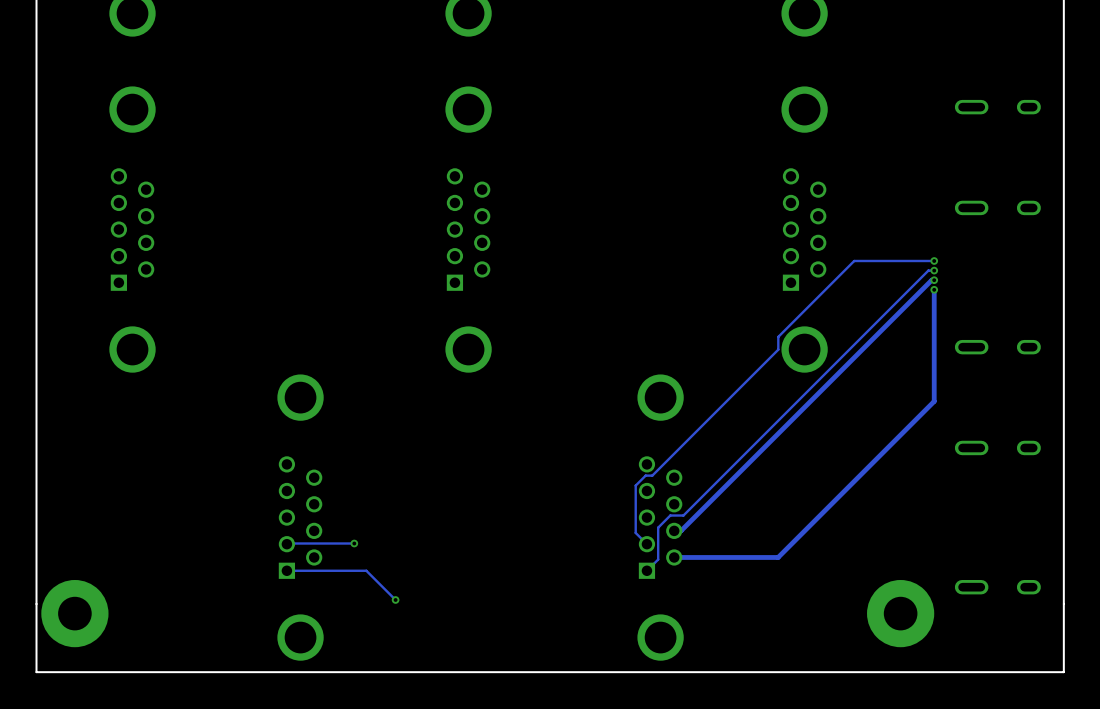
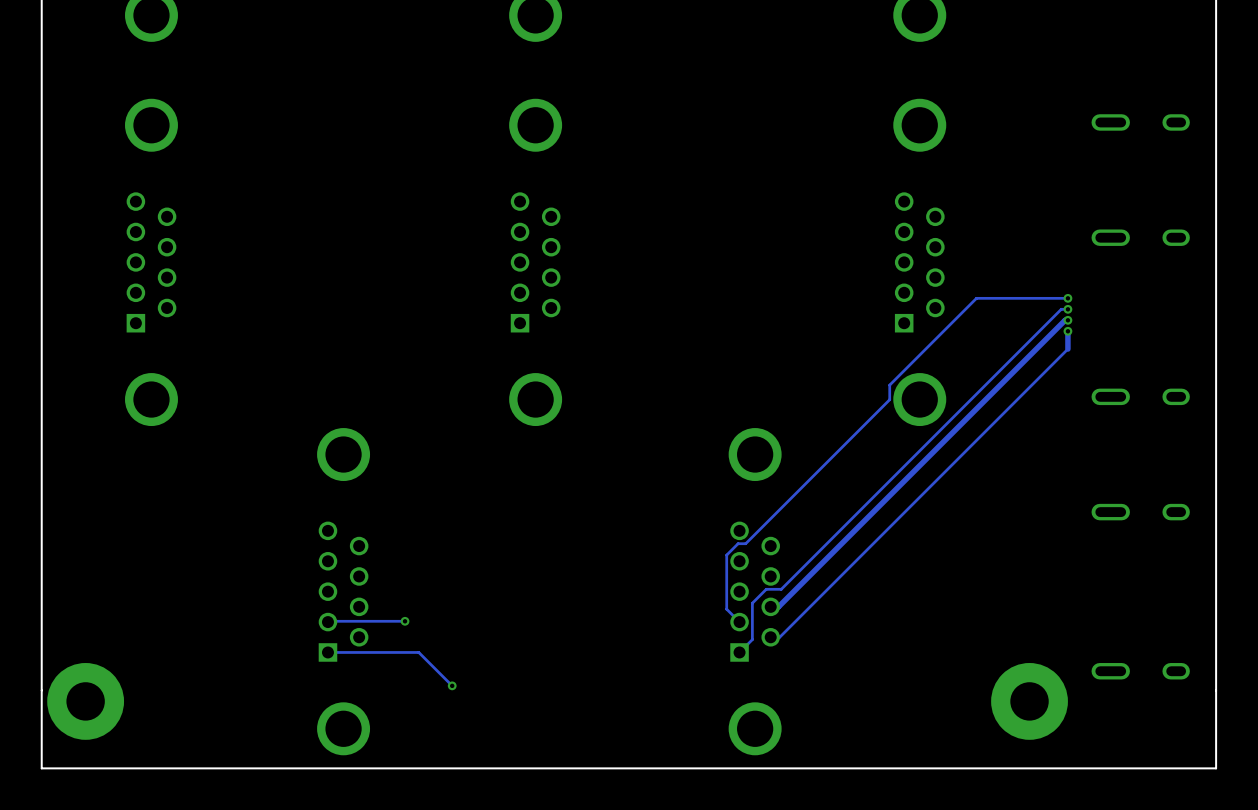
track: (934, 305) (934, 401) (778, 557) (674, 557) -> (1067, 349) (779, 637)

